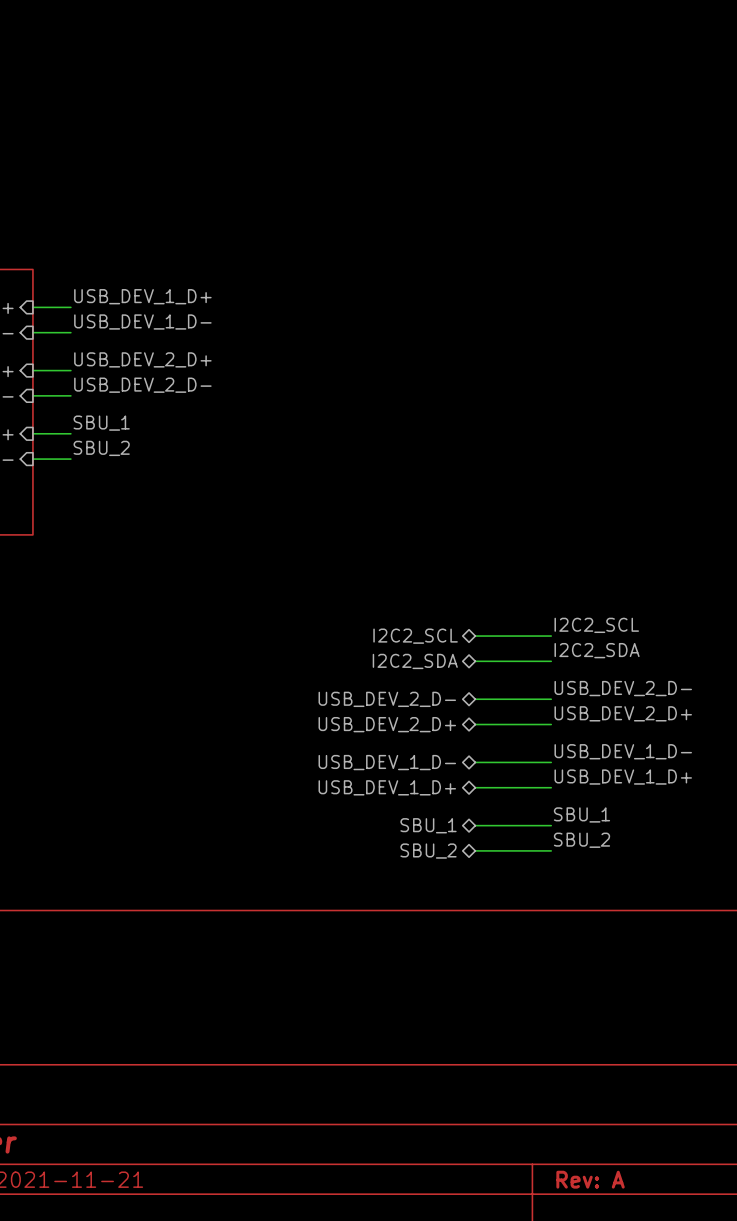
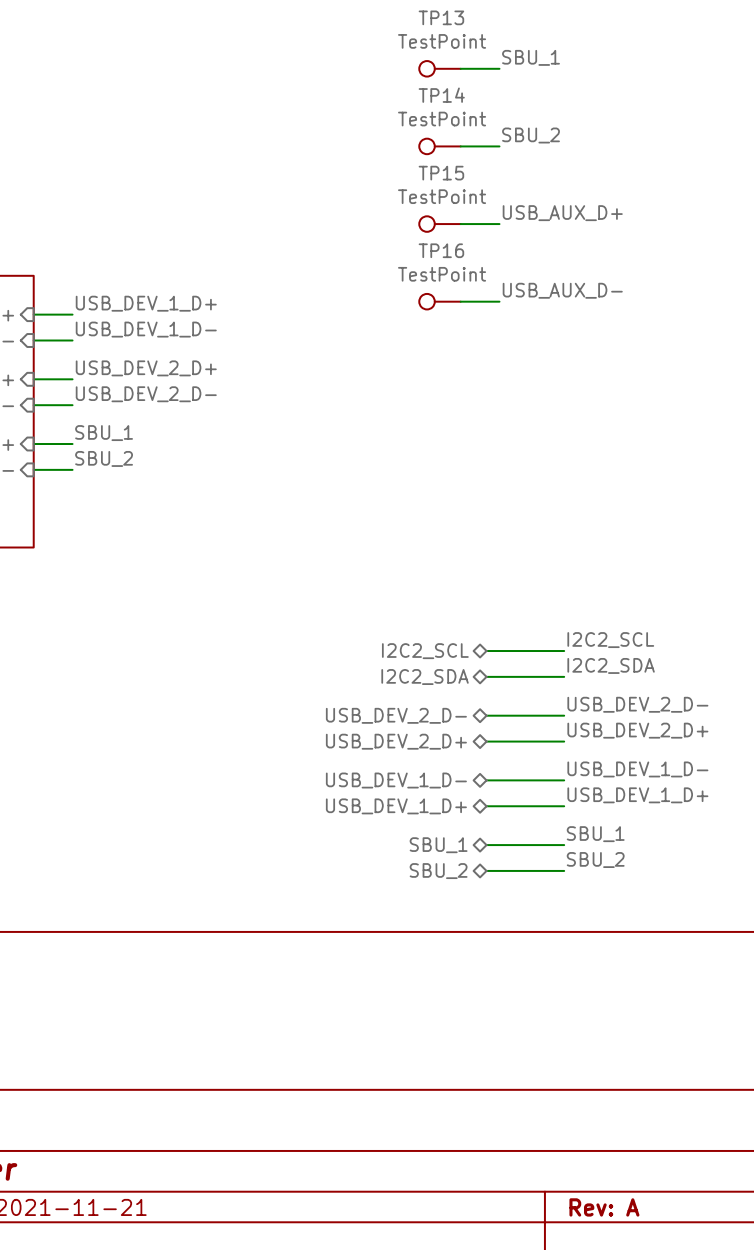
label: none -> SBU_1 (531, 57)
TP13: none -> TestPoint (439, 68)
wire: none -> (460, 68) (499, 68)
label: none -> SBU_2 (531, 135)
TP14: none -> TestPoint (439, 146)
wire: none -> (460, 146) (499, 146)
label: none -> USB_AUX_D+ (562, 213)
TP15: none -> TestPoint (439, 224)
wire: none -> (460, 224) (499, 224)
label: none -> USB_AUX_D- (562, 290)
TP16: none -> TestPoint (439, 301)
wire: none -> (460, 301) (499, 301)

